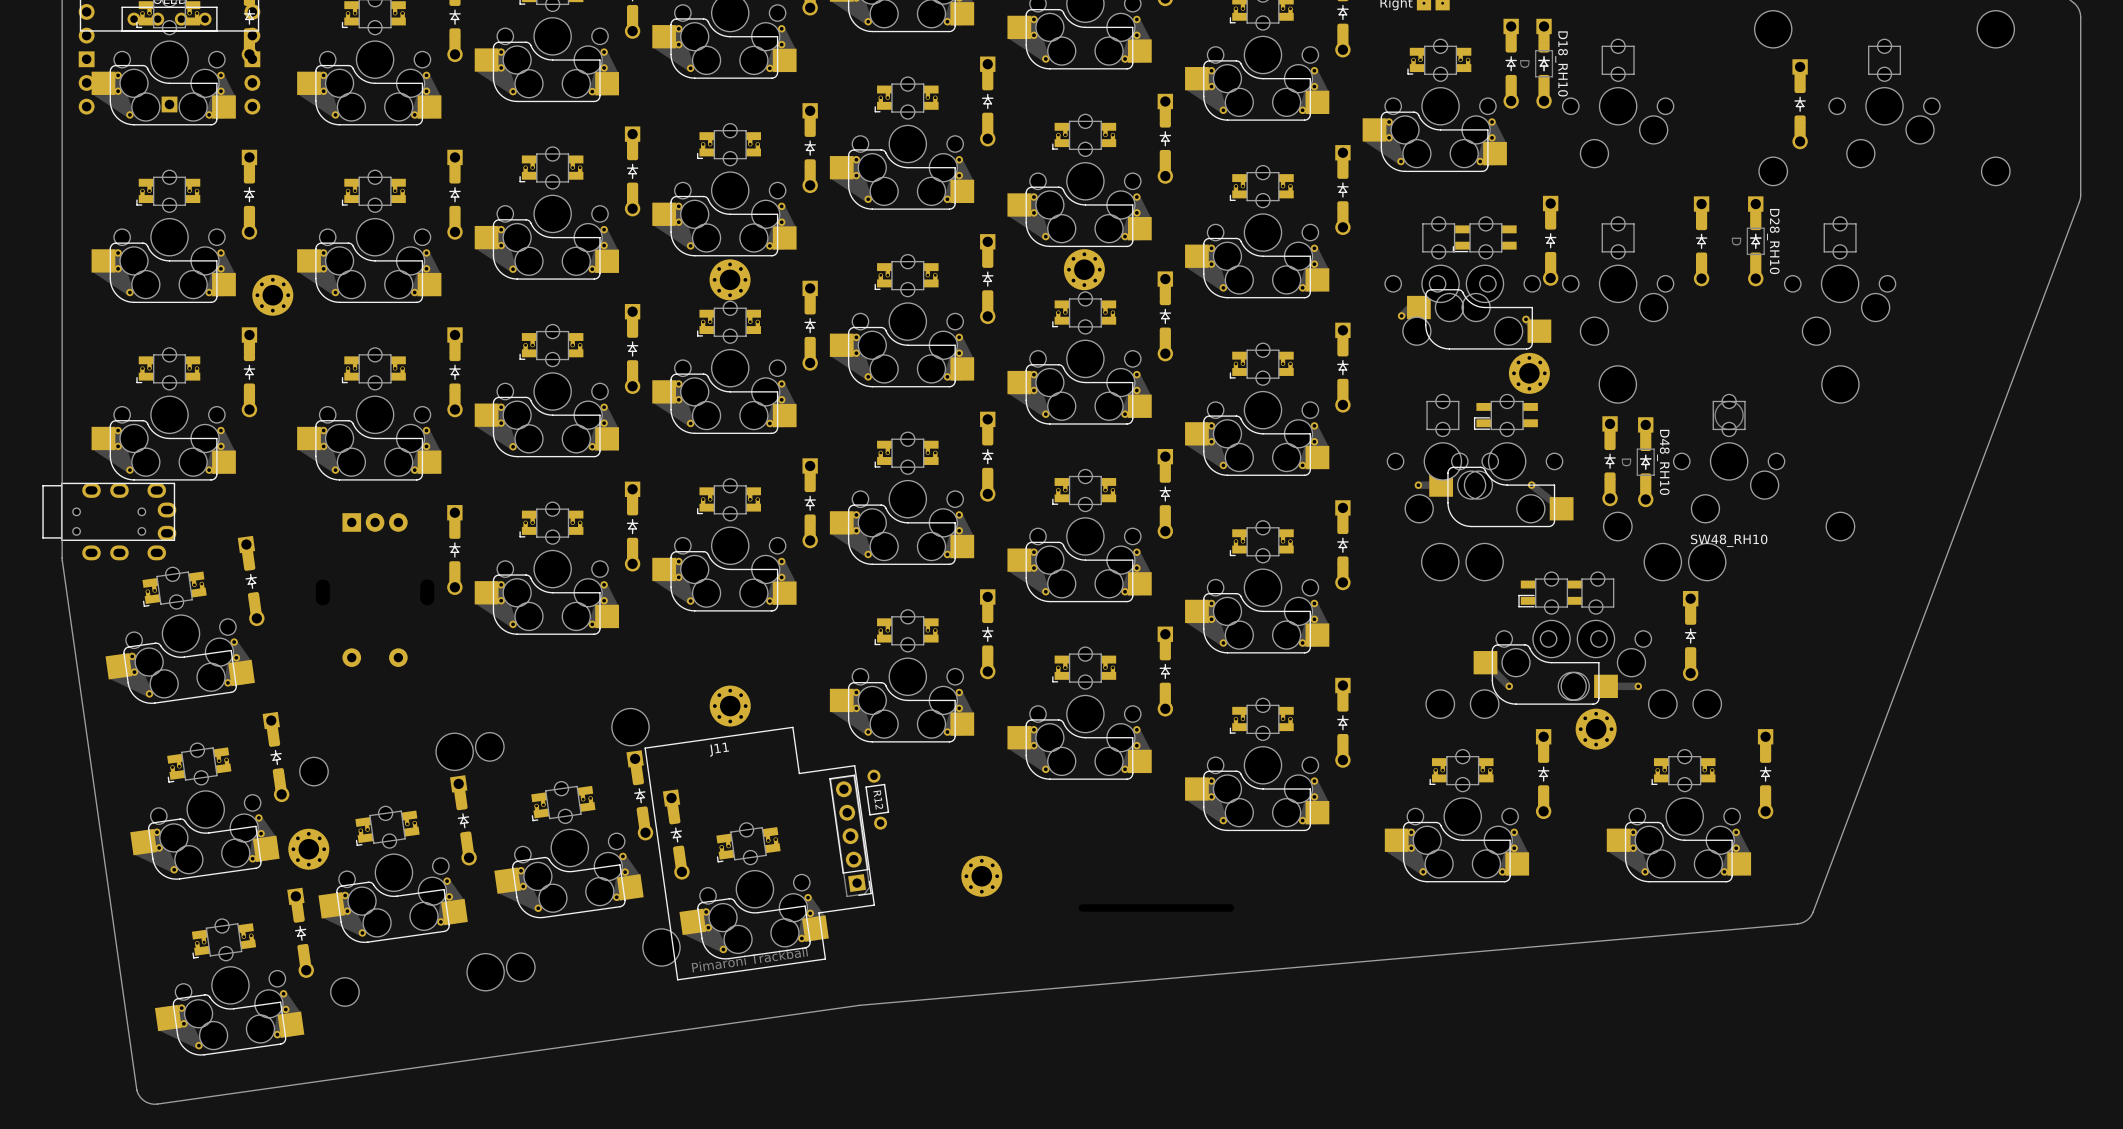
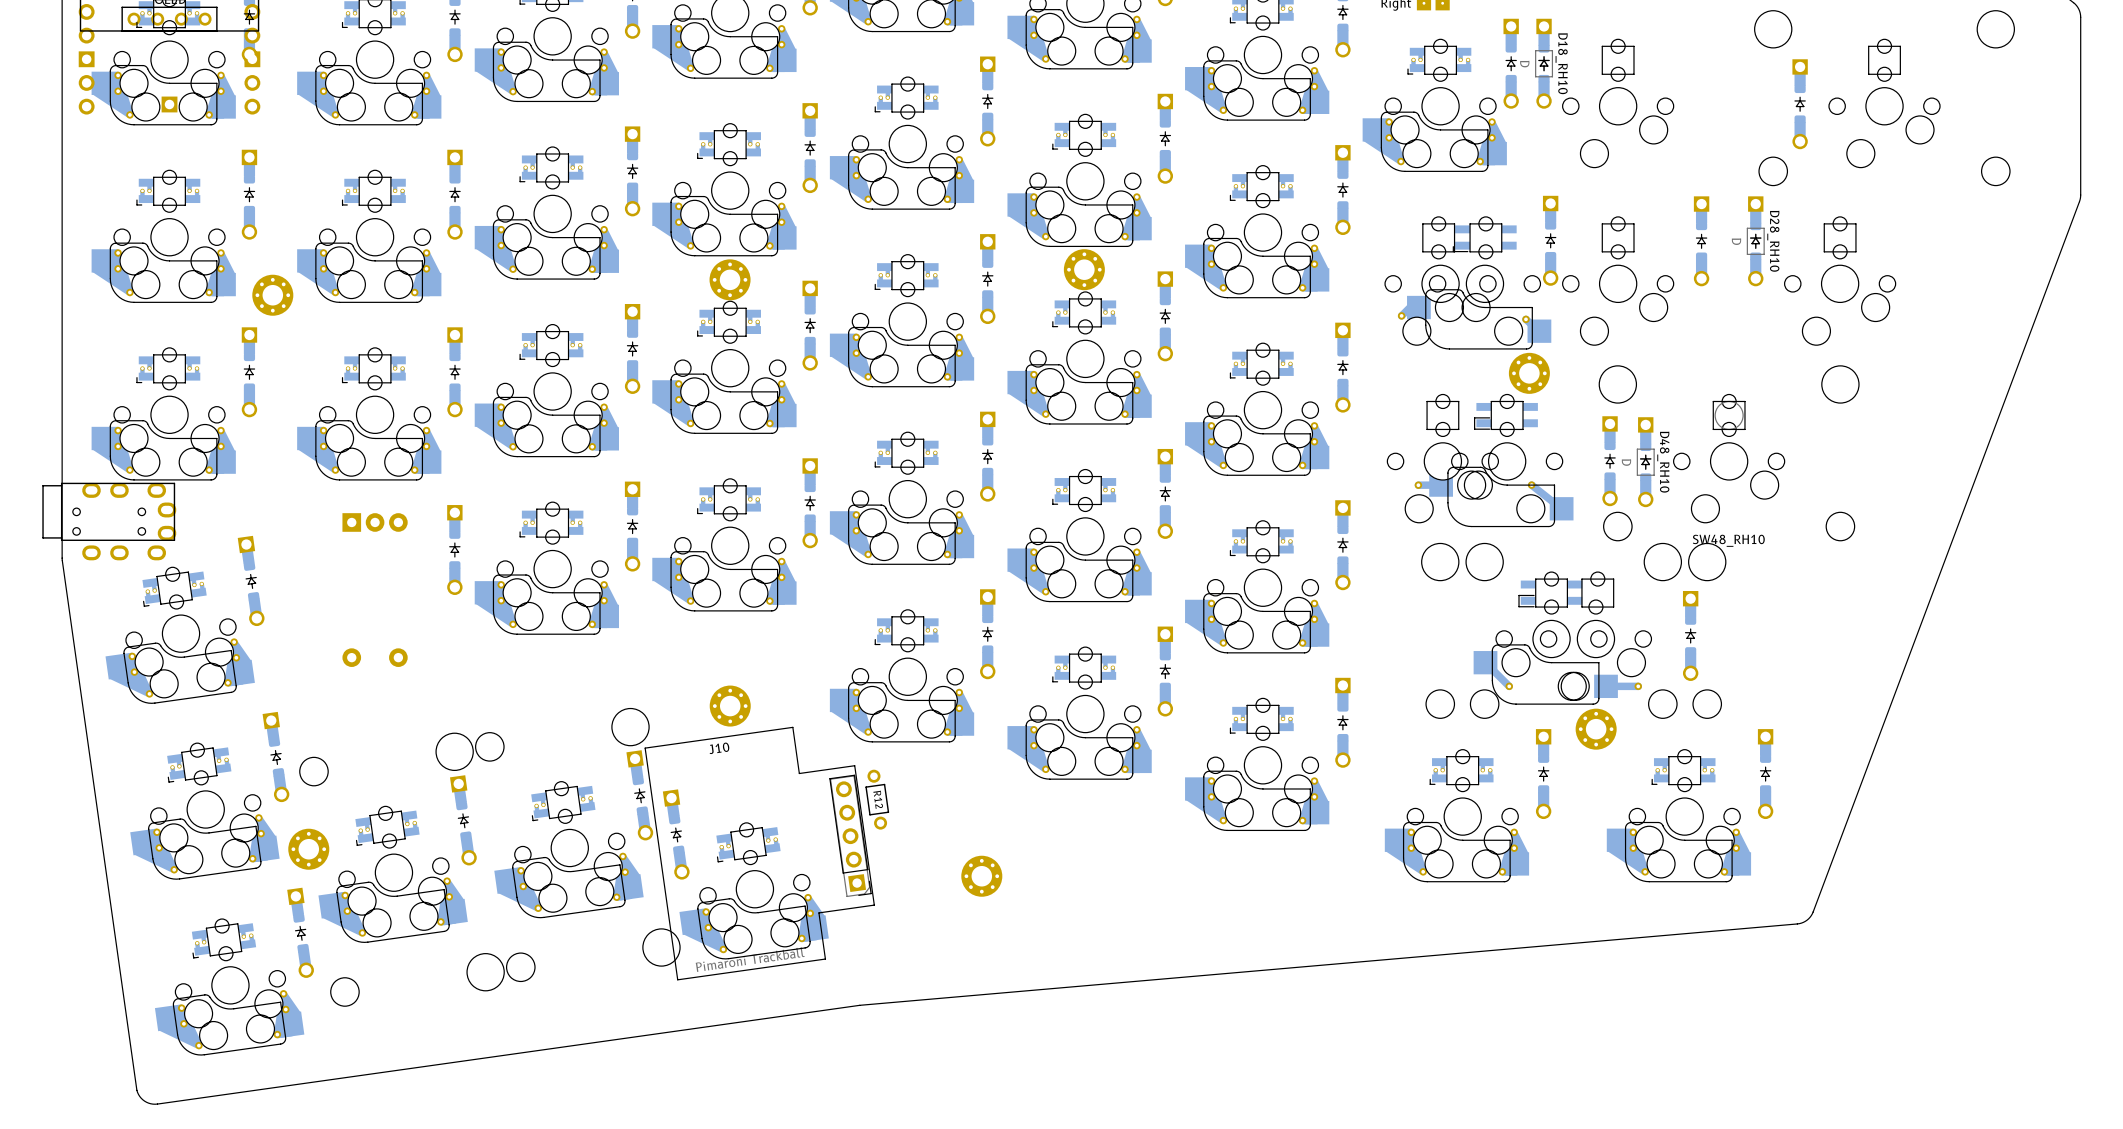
J11 name: J11 (719, 749) -> J10 (719, 748)

